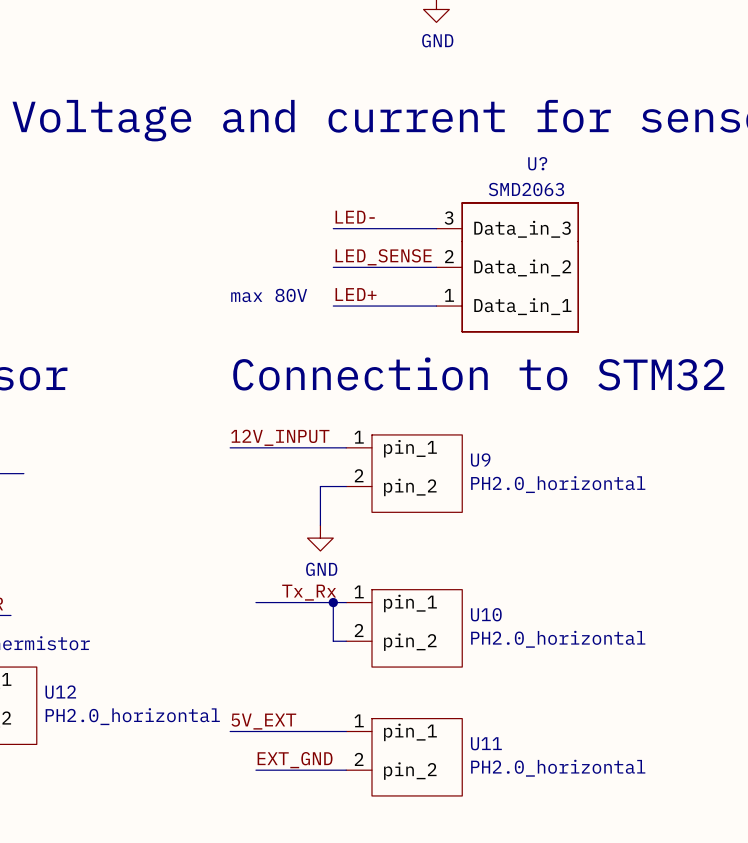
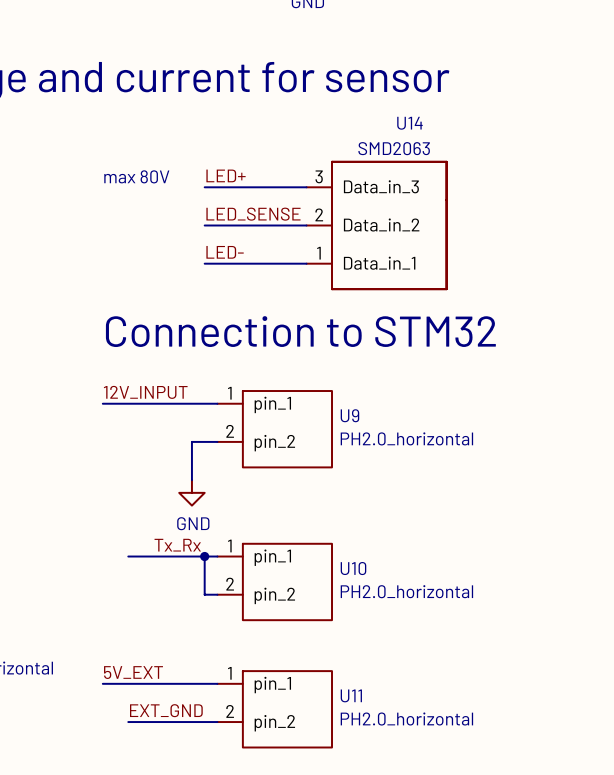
U? name: U? (537, 163) -> U14 (409, 123)
label: LED- (355, 217) -> LED+ (226, 175)
label: LED+ (356, 294) -> LED- (225, 252)
text position: max 80V (269, 295) -> max 80V (136, 176)

